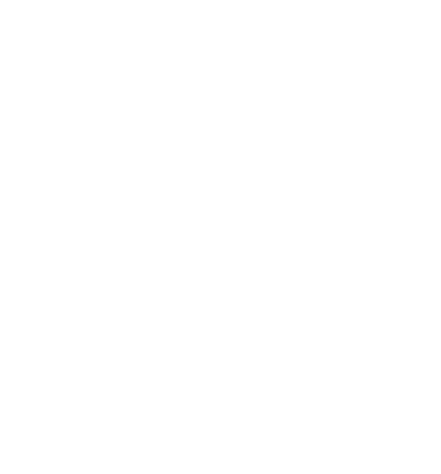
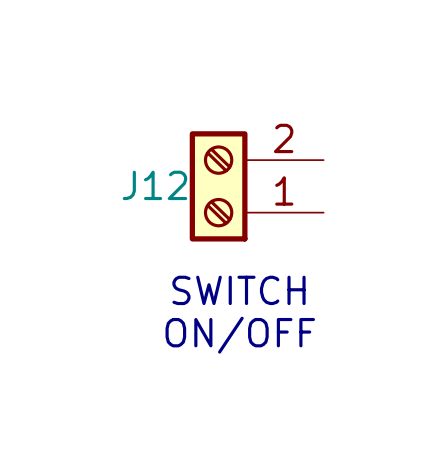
J12: none -> (256, 186)
text: none -> SWITCH (238, 290)
text: none -> ON/OFF (240, 335)

